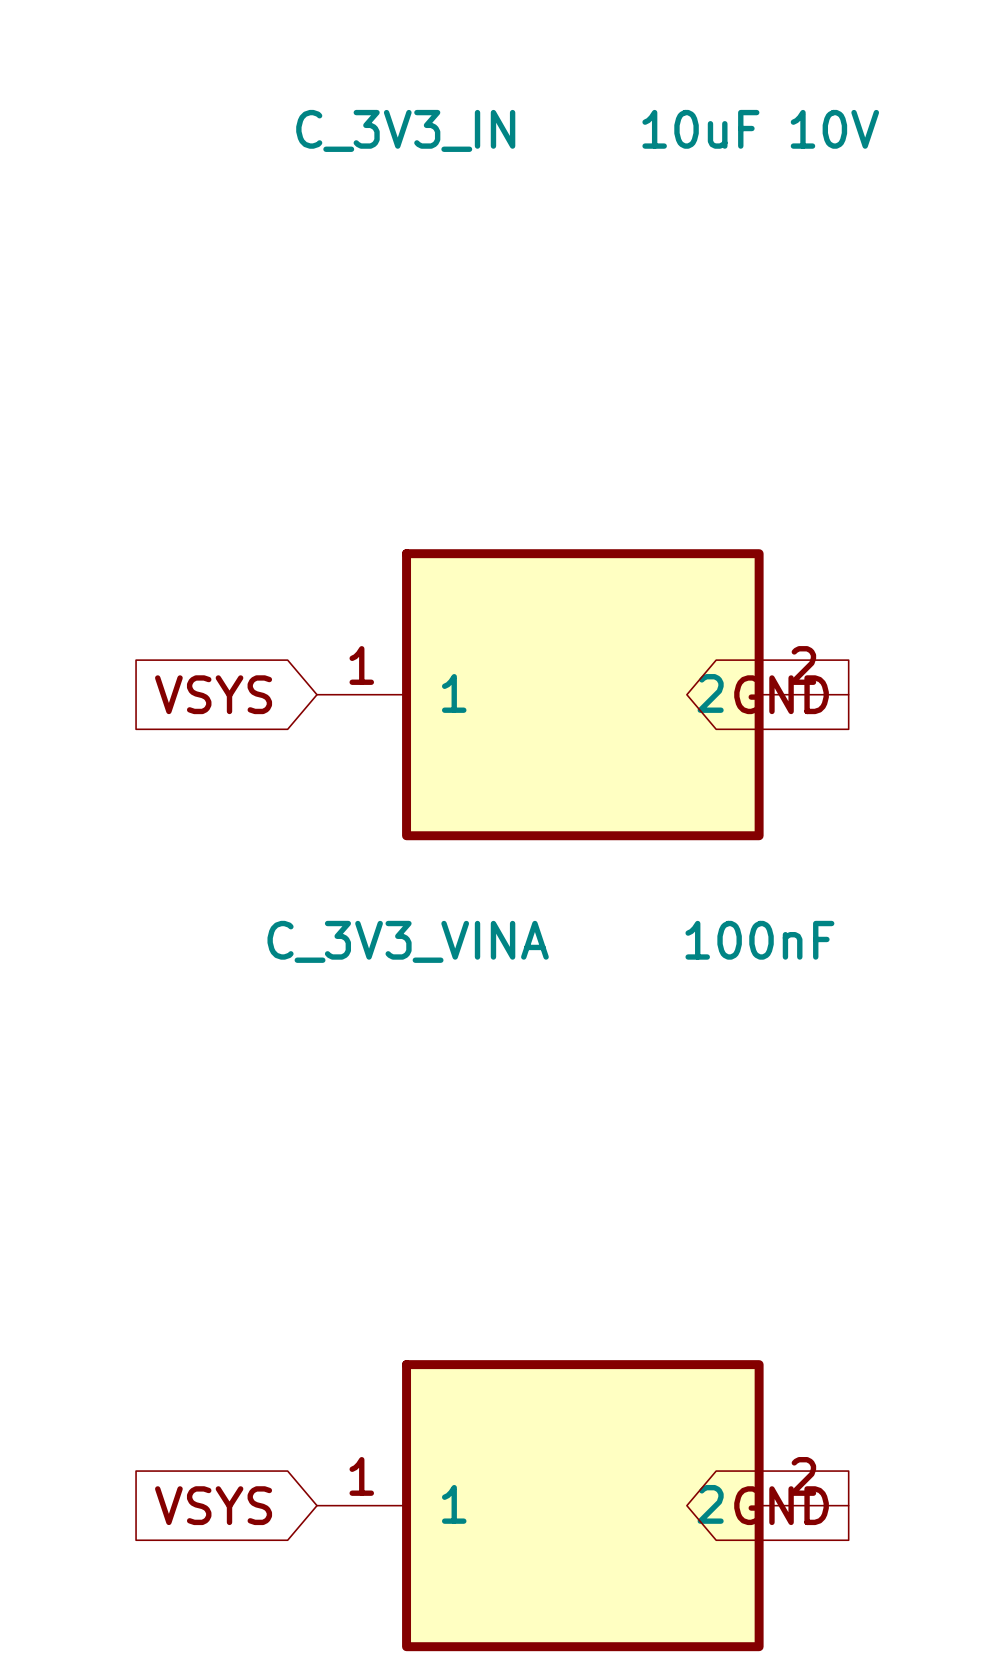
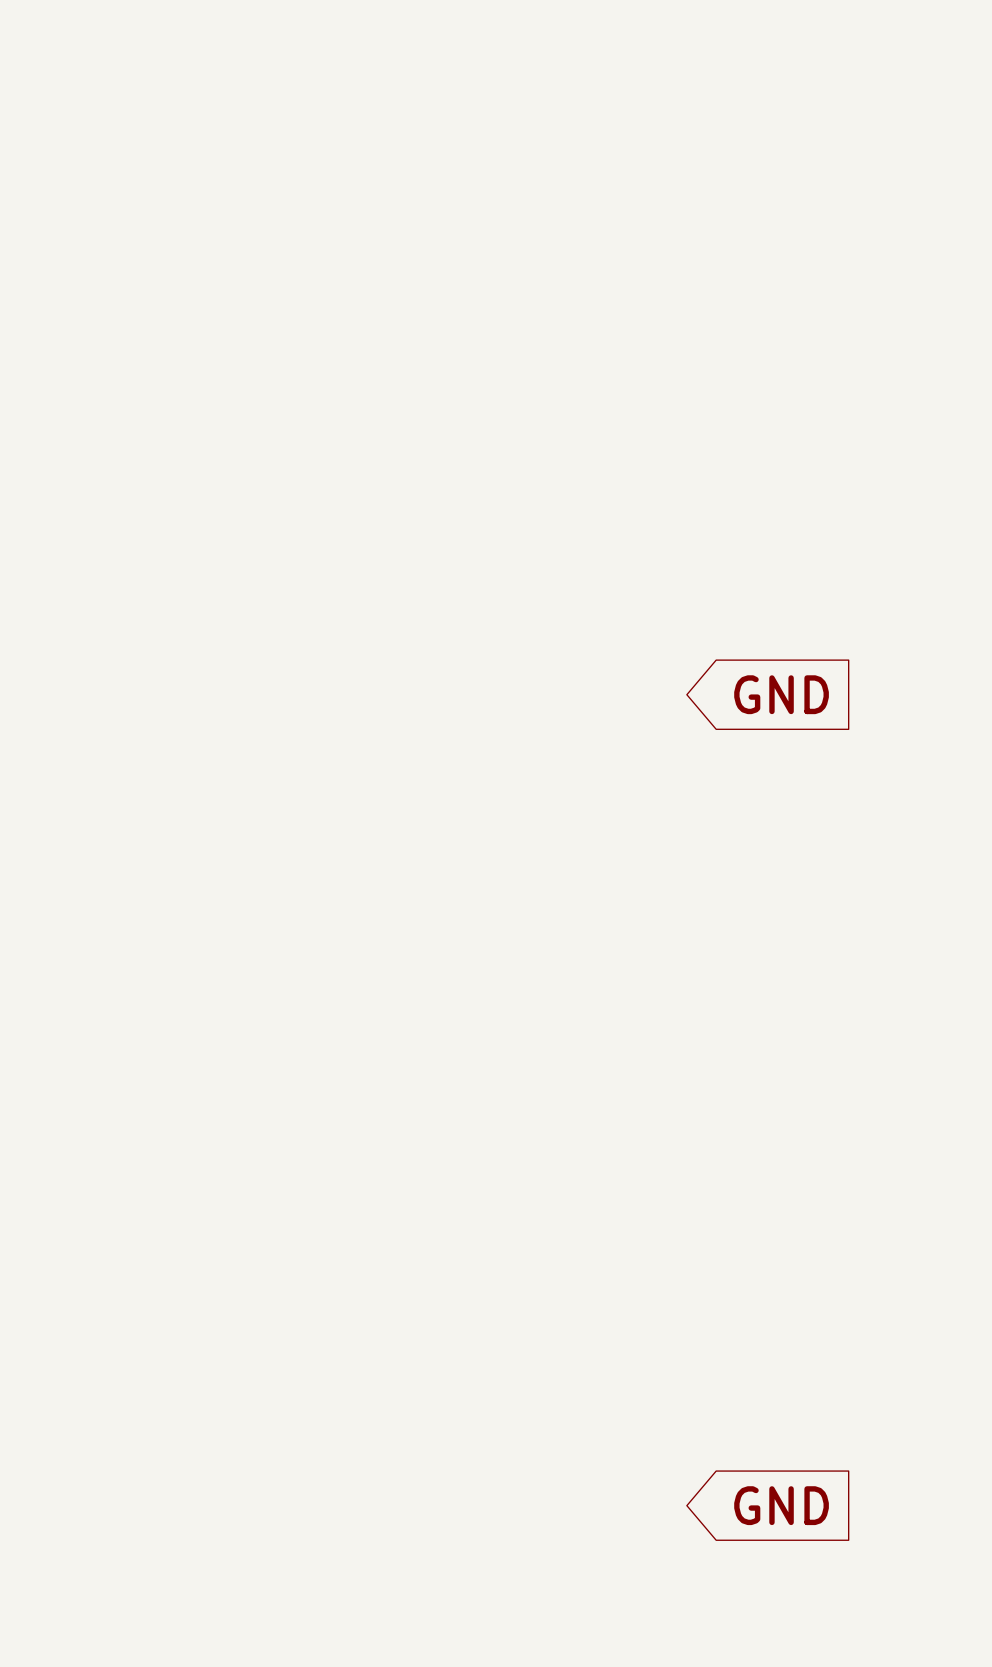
global label: VSYS (213, 694) -> none
C_3V3_IN: 10uF 10V (582, 694) -> none
global label: VSYS (213, 1505) -> none
C_3V3_VINA: 100nF (582, 1505) -> none

